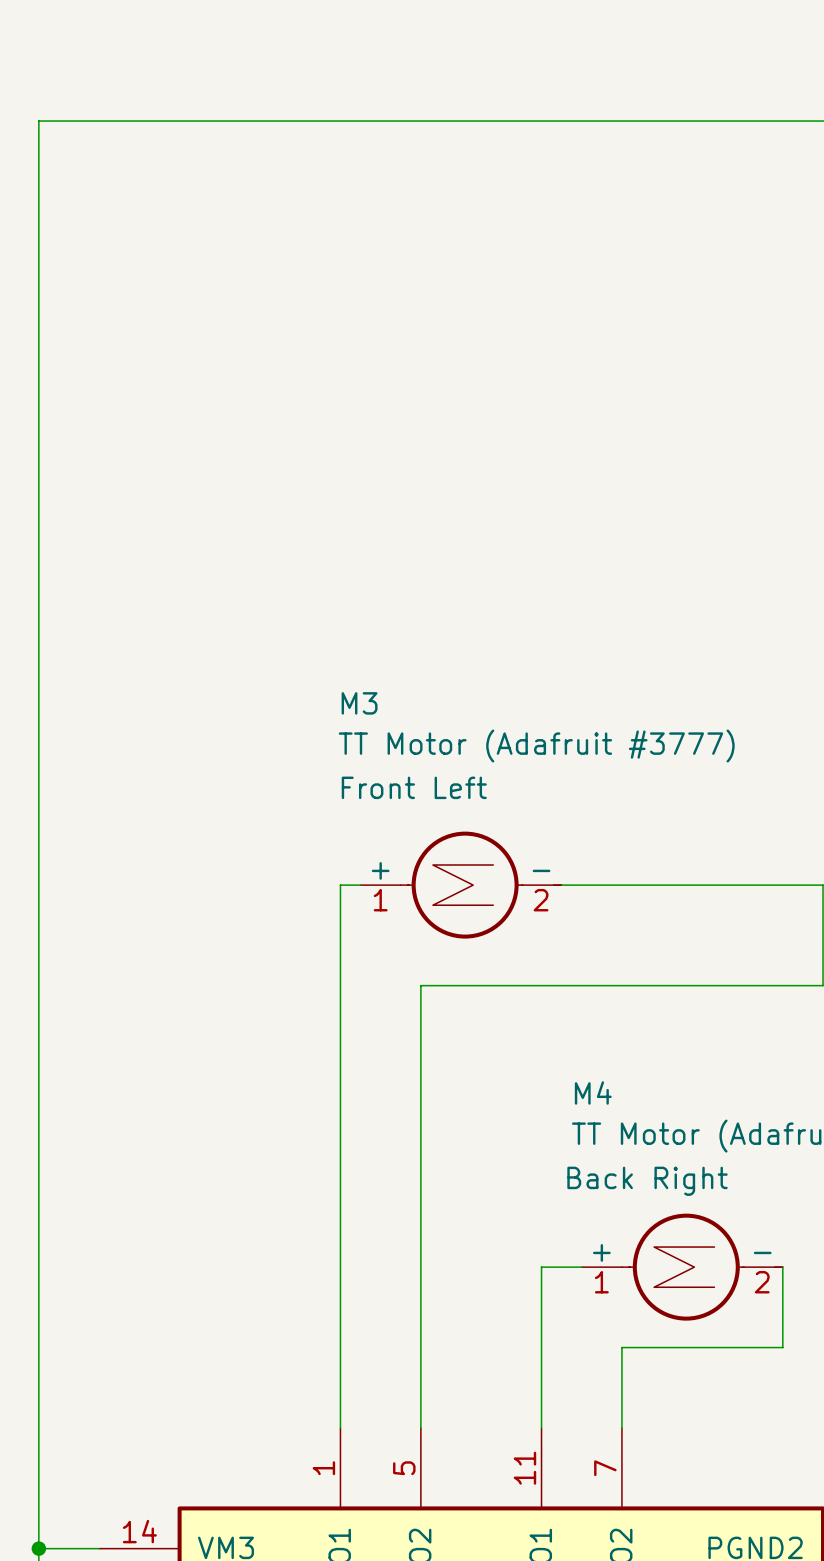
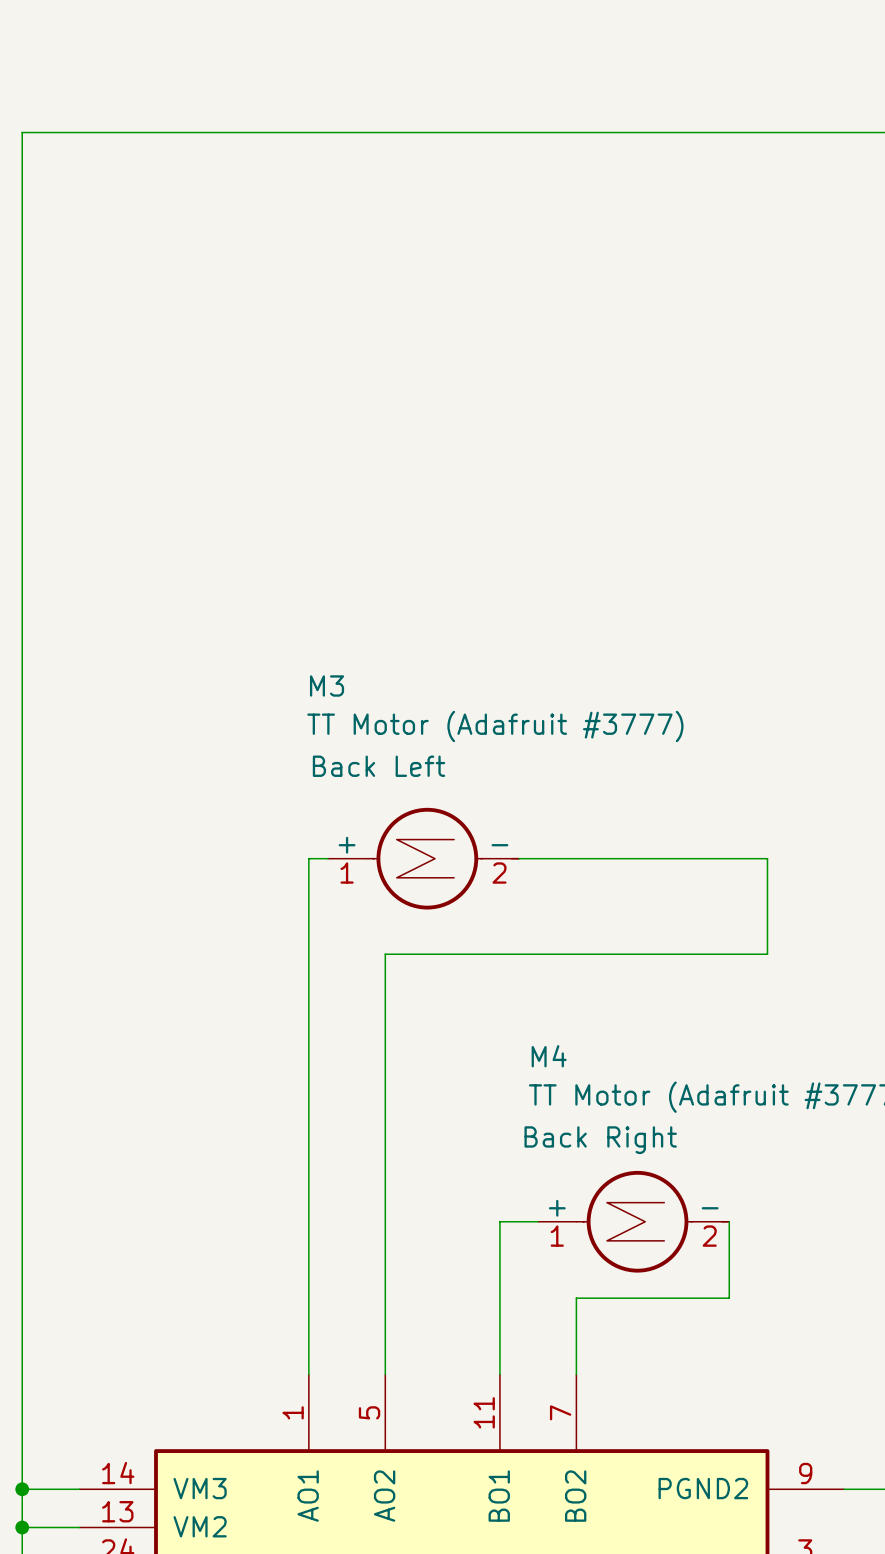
M3 text: Front Left (414, 787) -> Back Left (379, 766)

